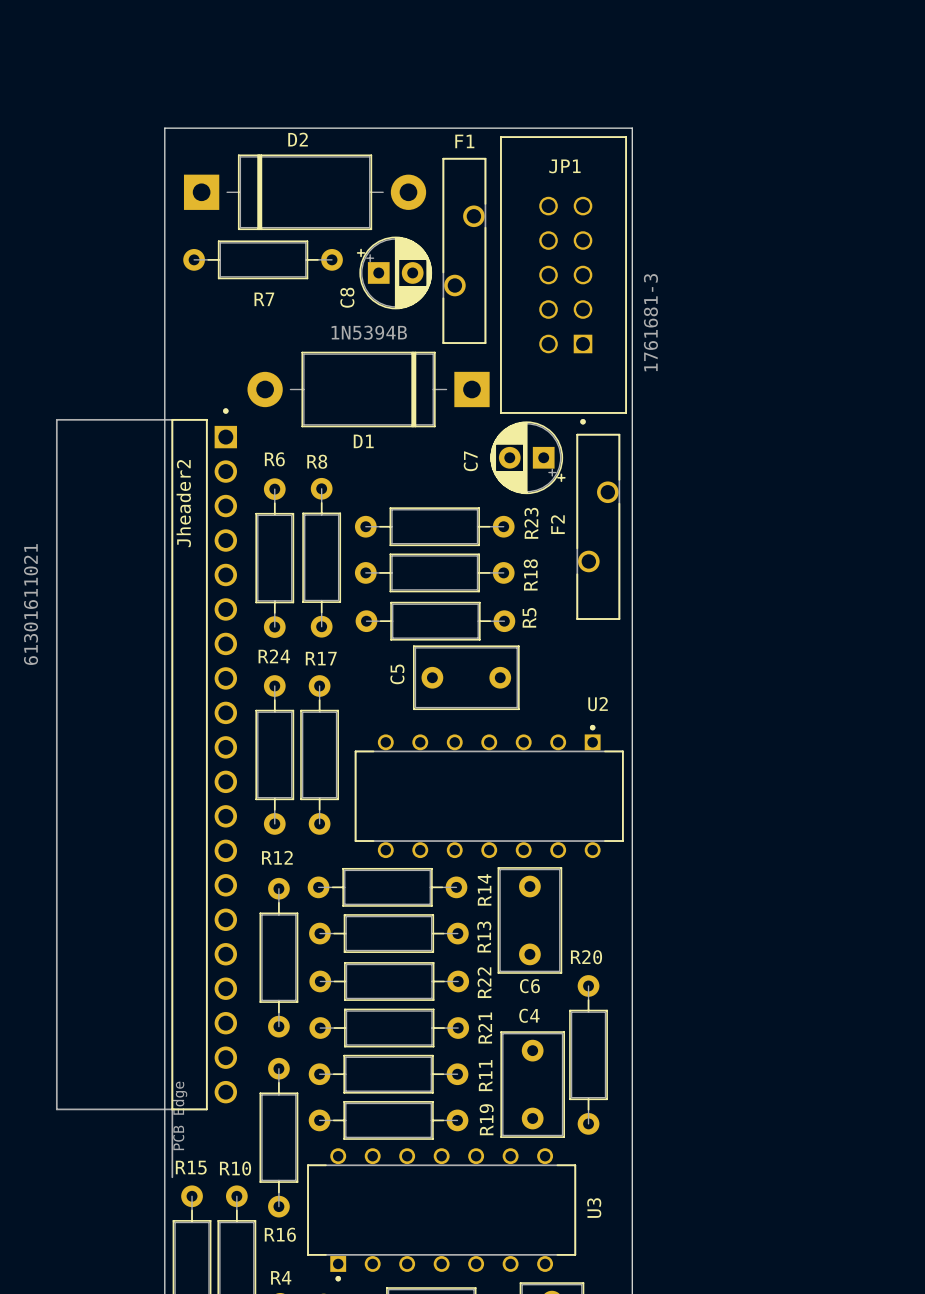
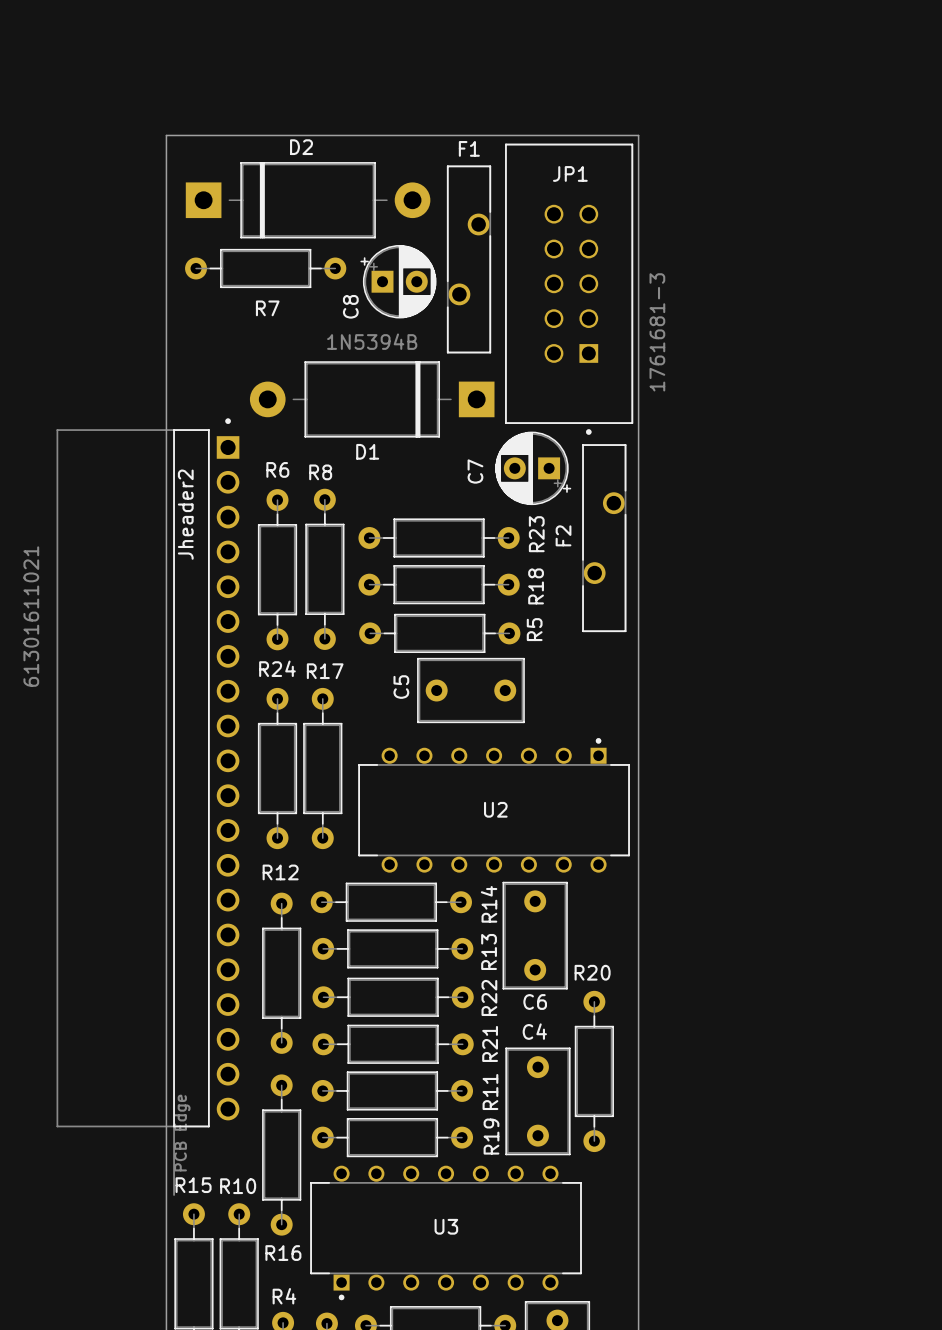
U2 name position: U2 (598, 704) -> U2 (495, 809)
U3 name rotation: 0° (594, 1208) -> 90° clockwise (446, 1226)
U3 name position: U3 (594, 1208) -> U3 (446, 1226)

